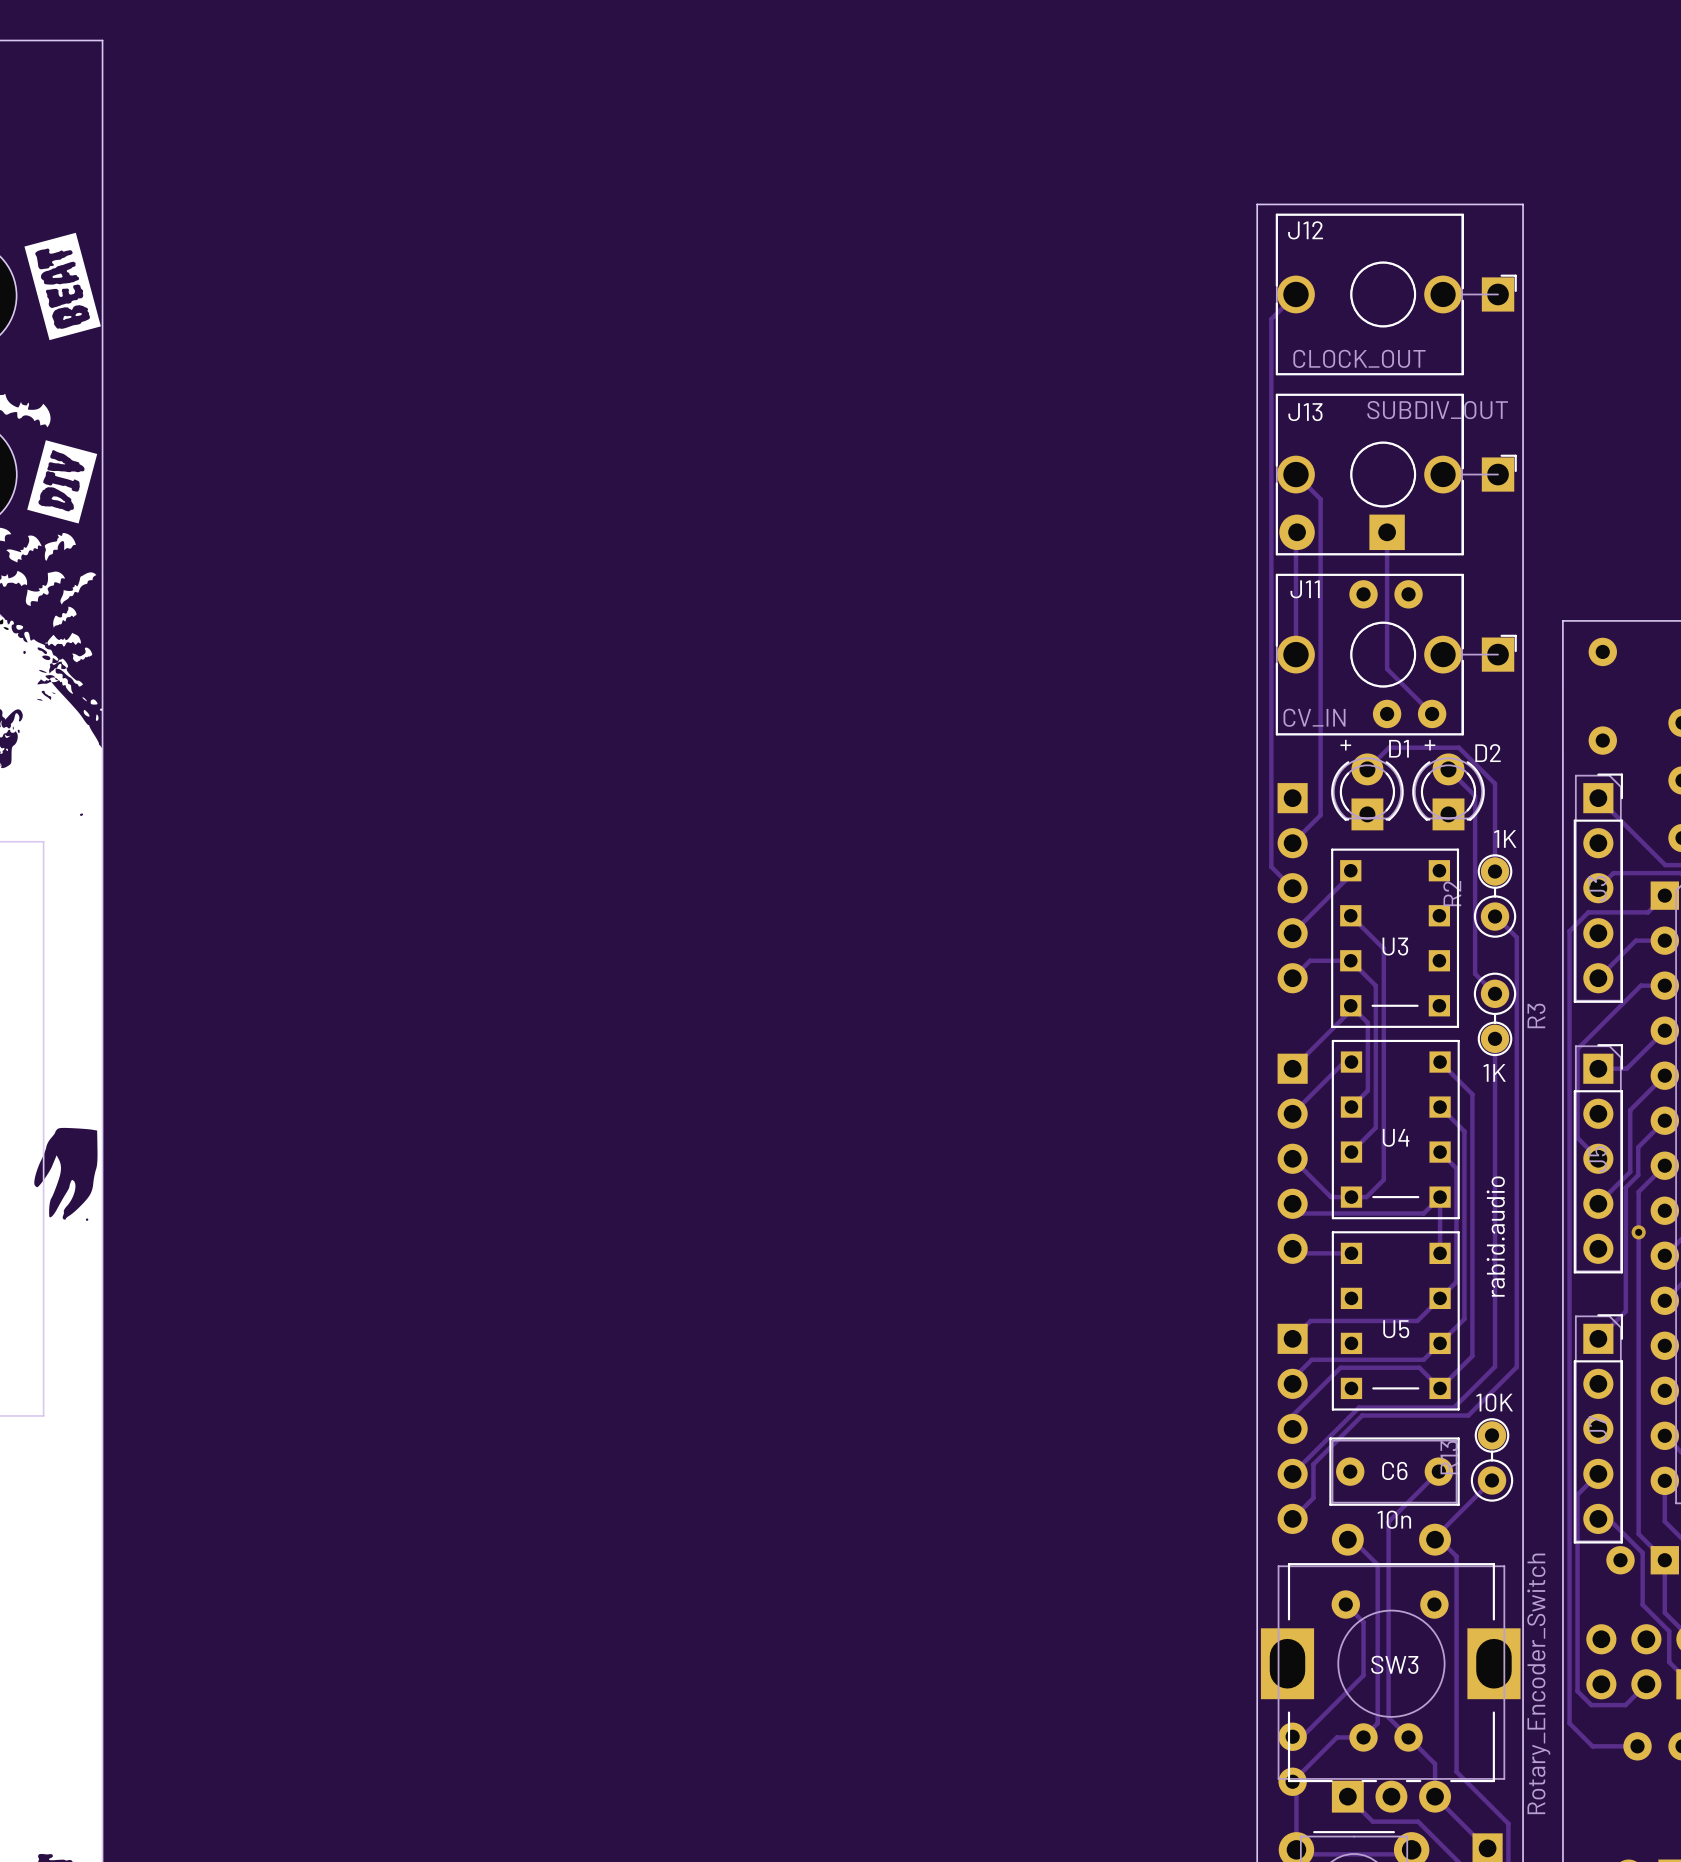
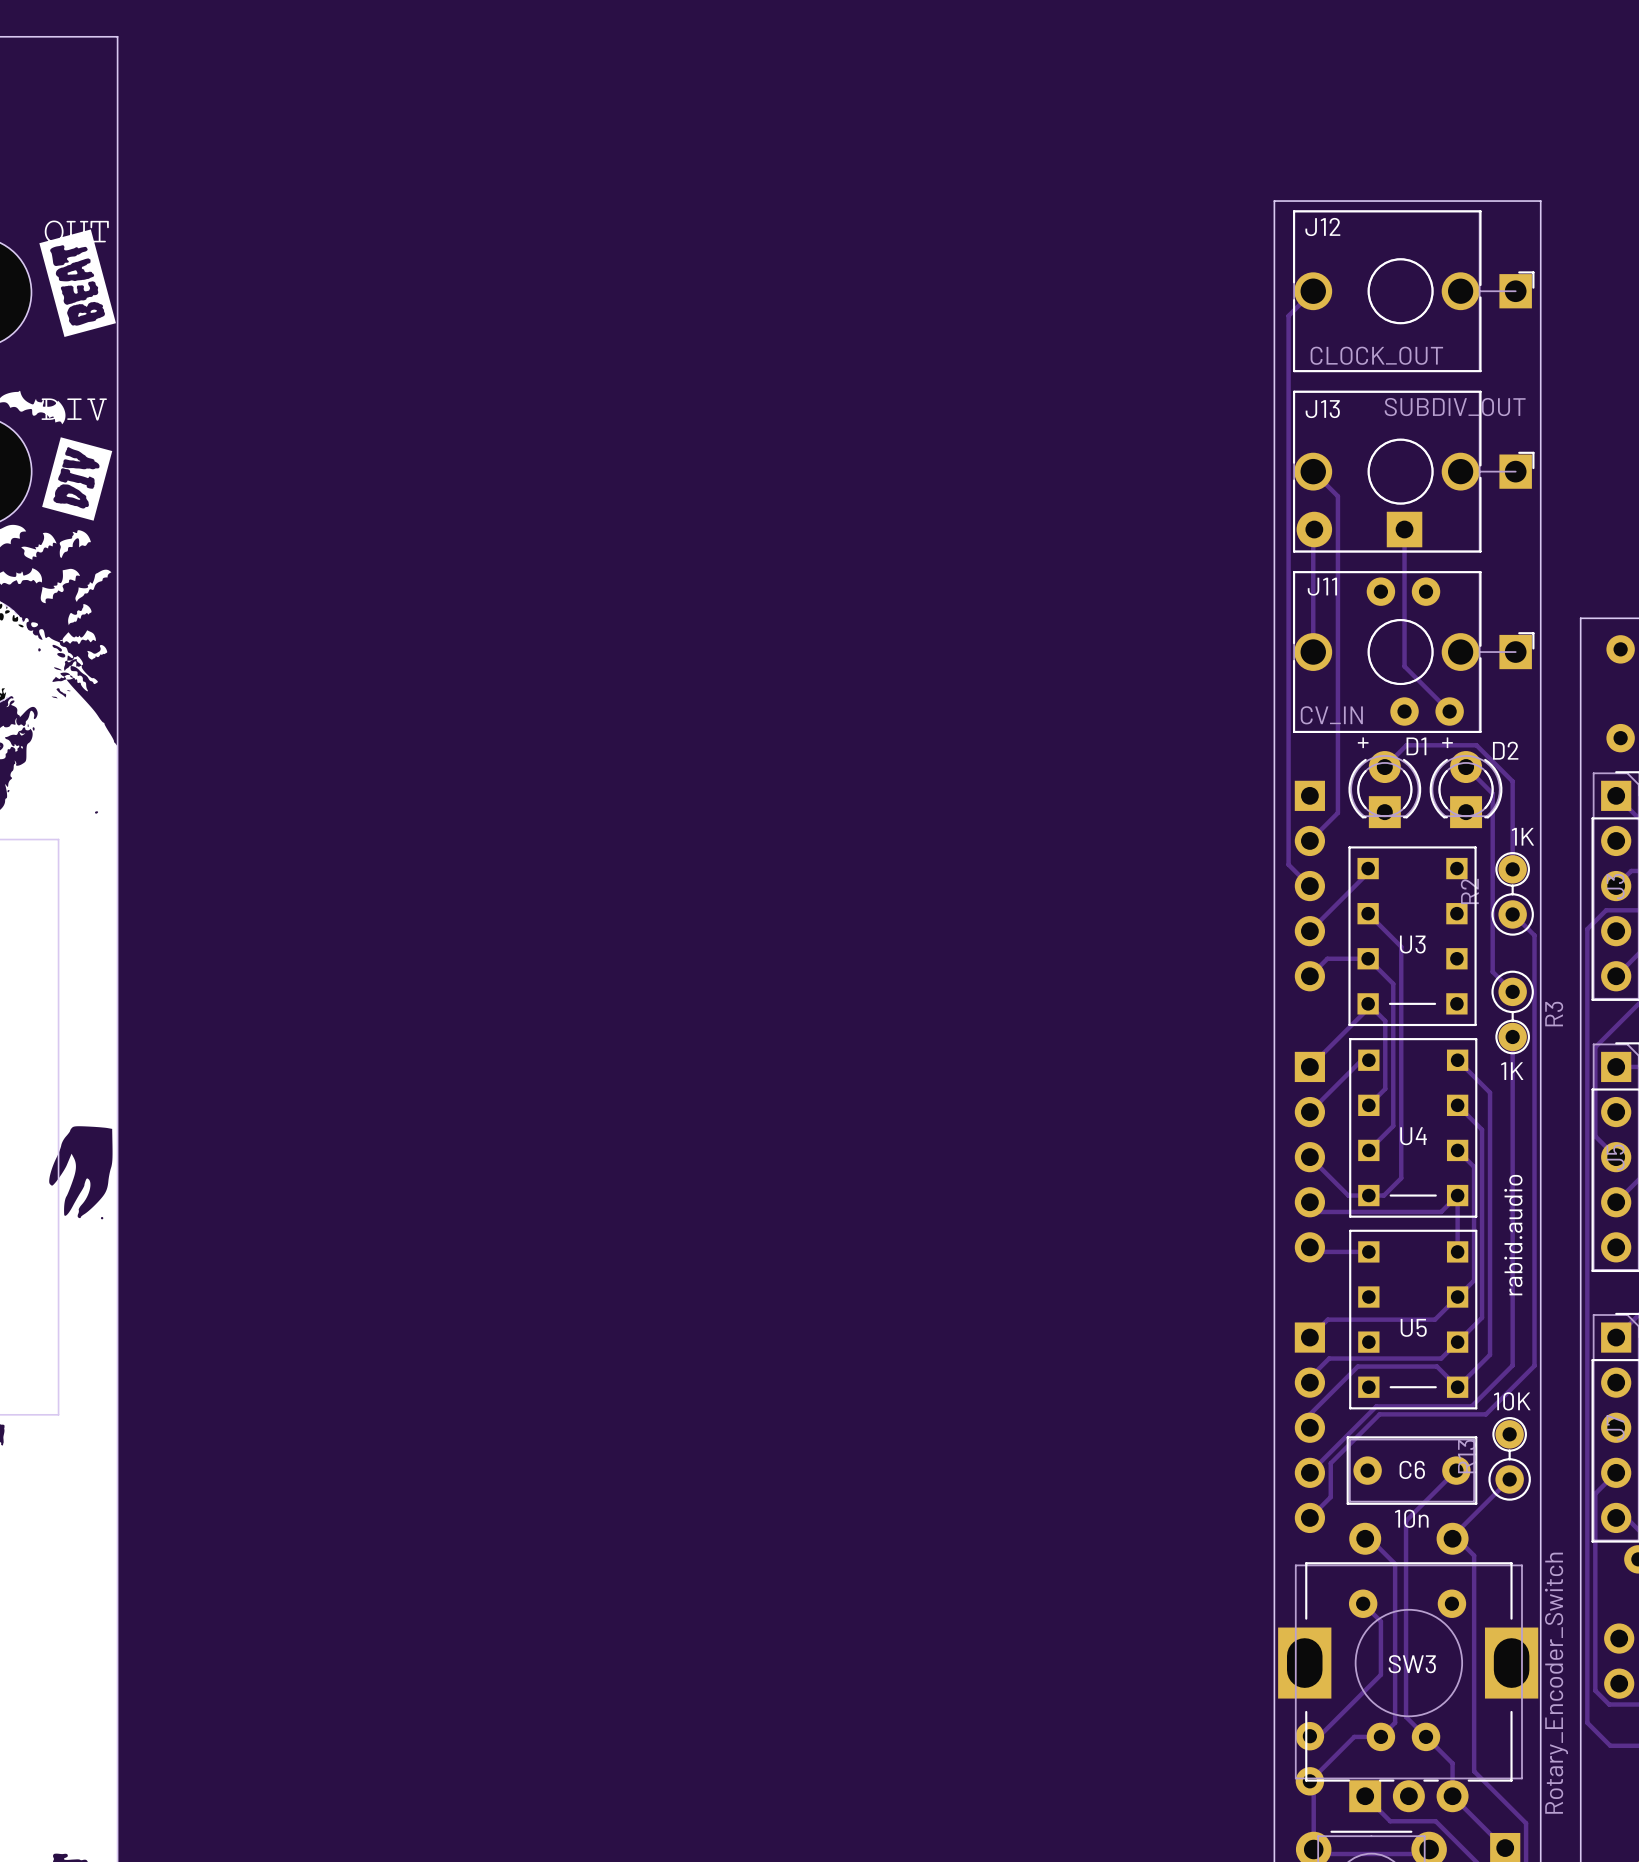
drawing: none -> [44, 220, 109, 243]
drawing: none -> [41, 398, 107, 421]
drawing: [82, 697, 103, 721] -> none

